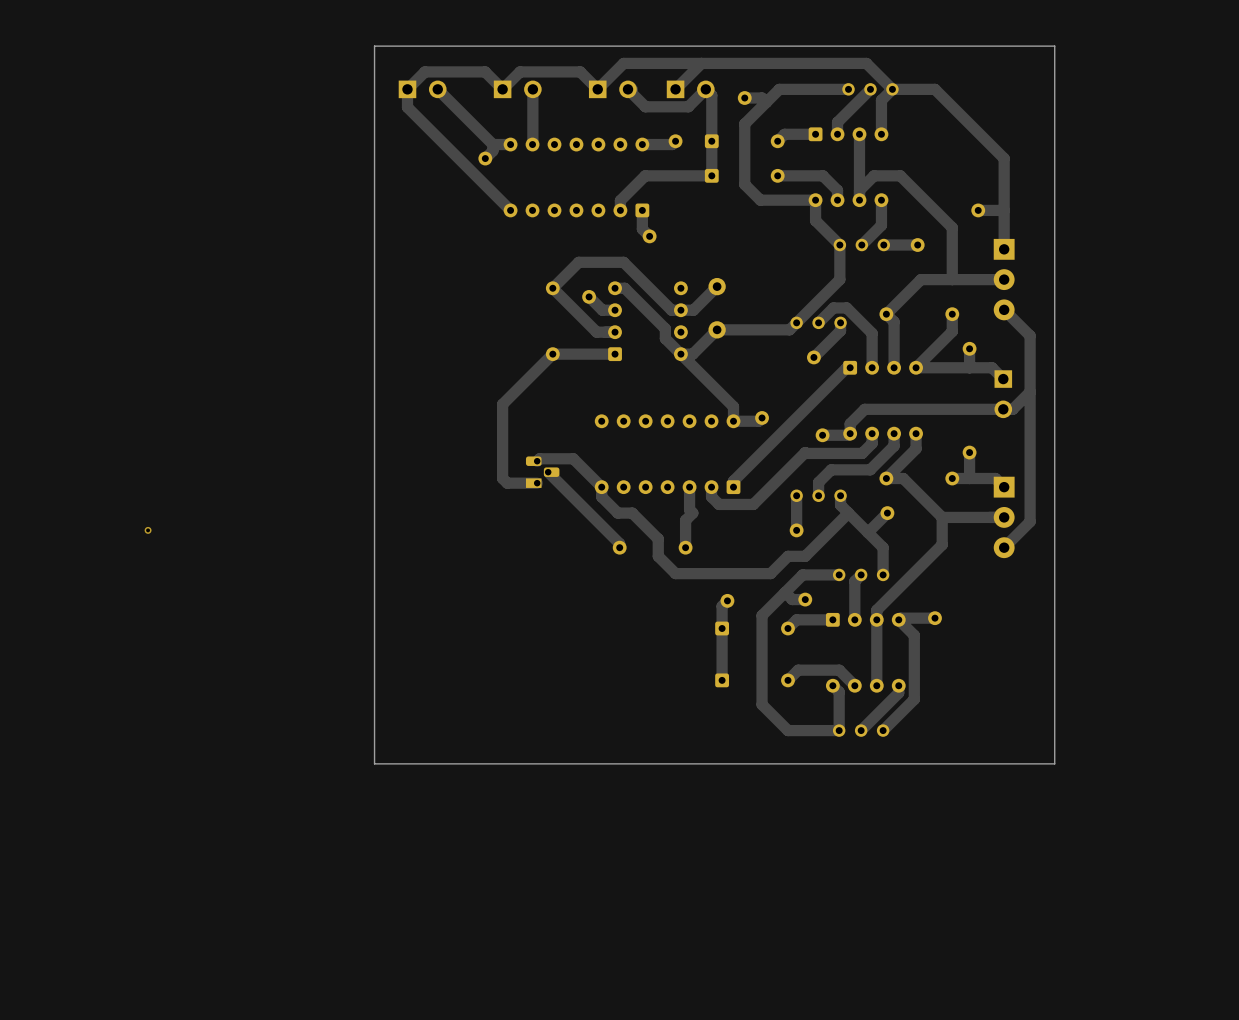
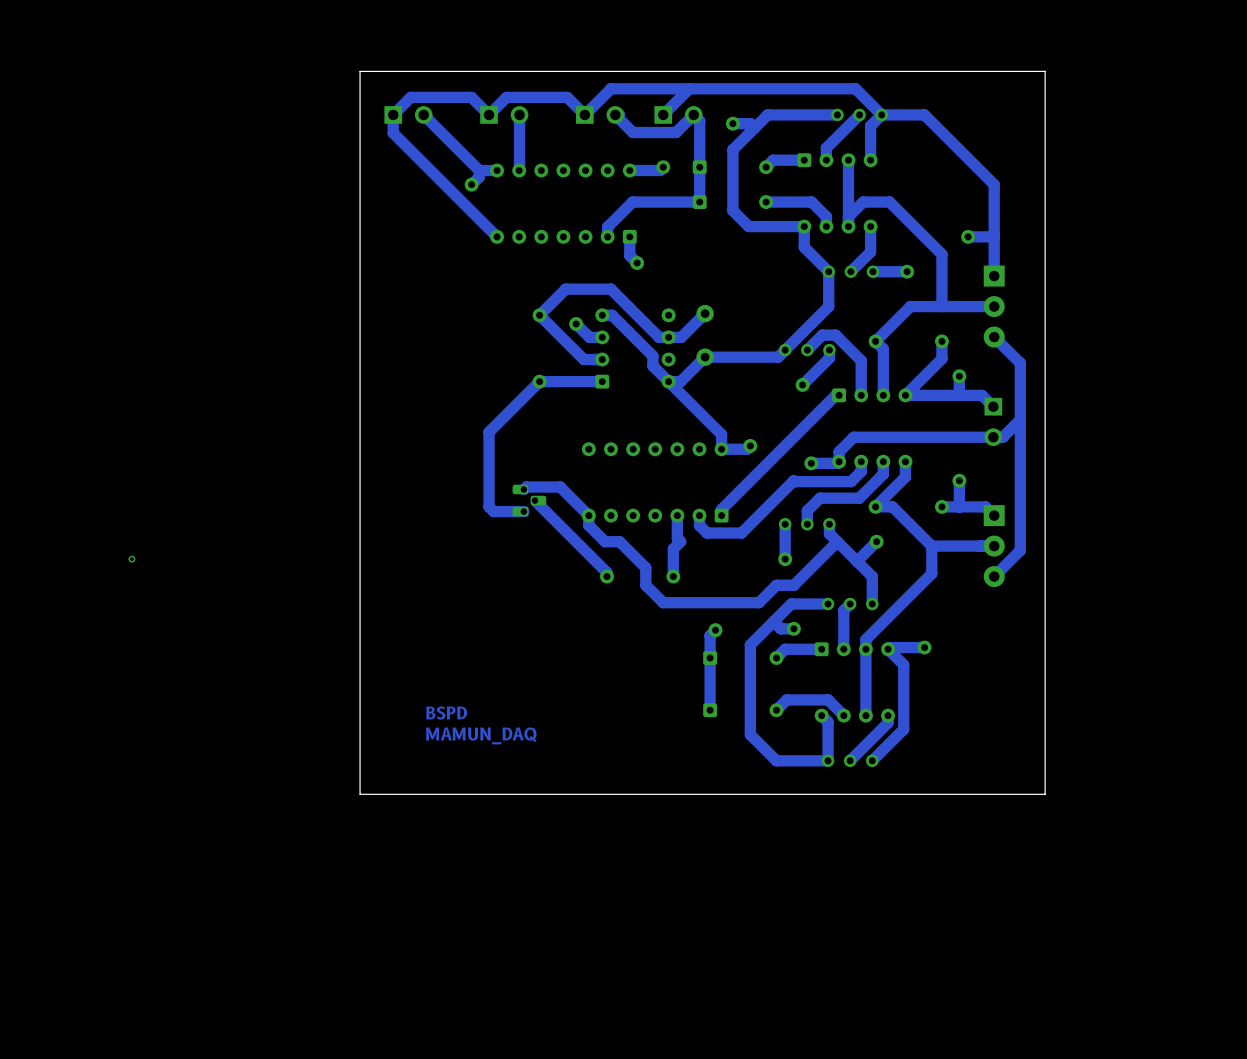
text: none -> BSPD (446, 713)
text: none -> MAMUN_DAQ (481, 735)

